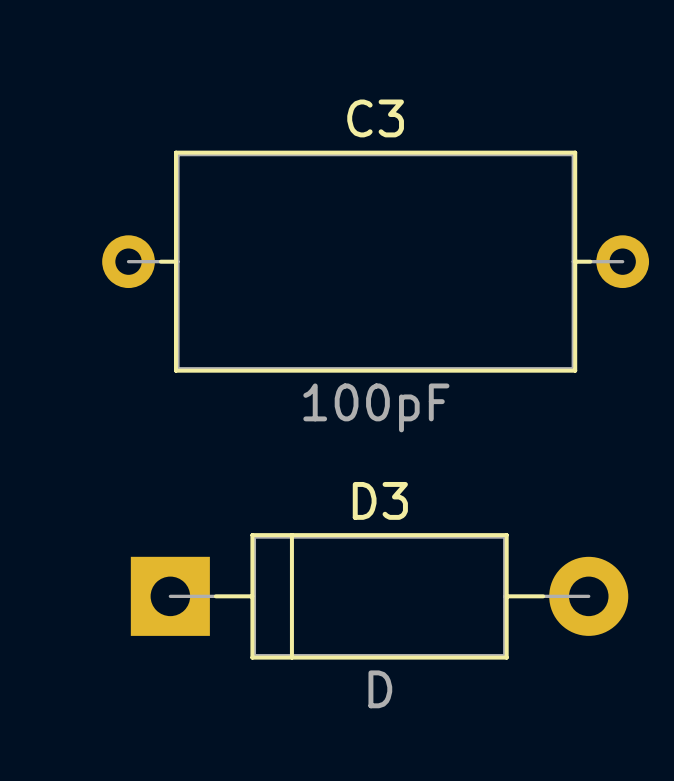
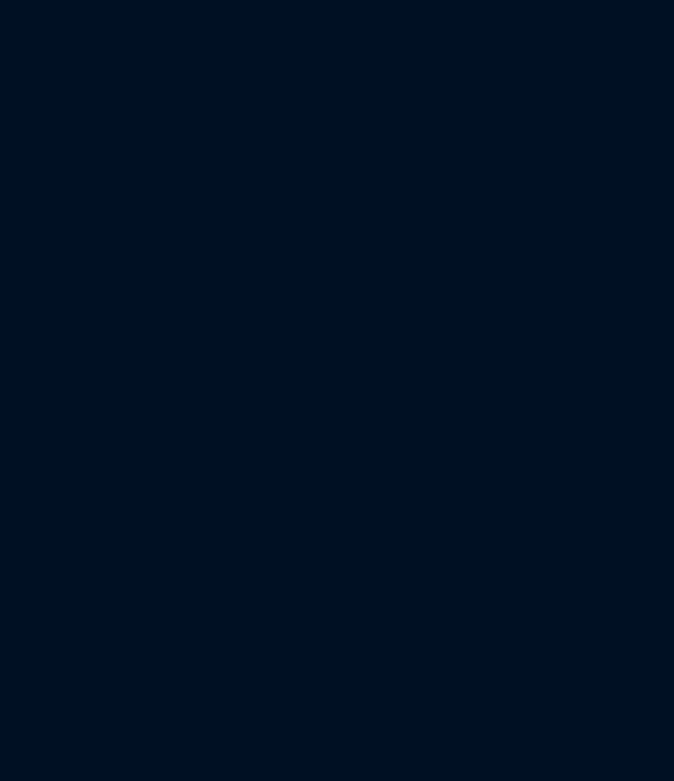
C3: 100pF (375, 261) -> none
D3: D (379, 596) -> none

